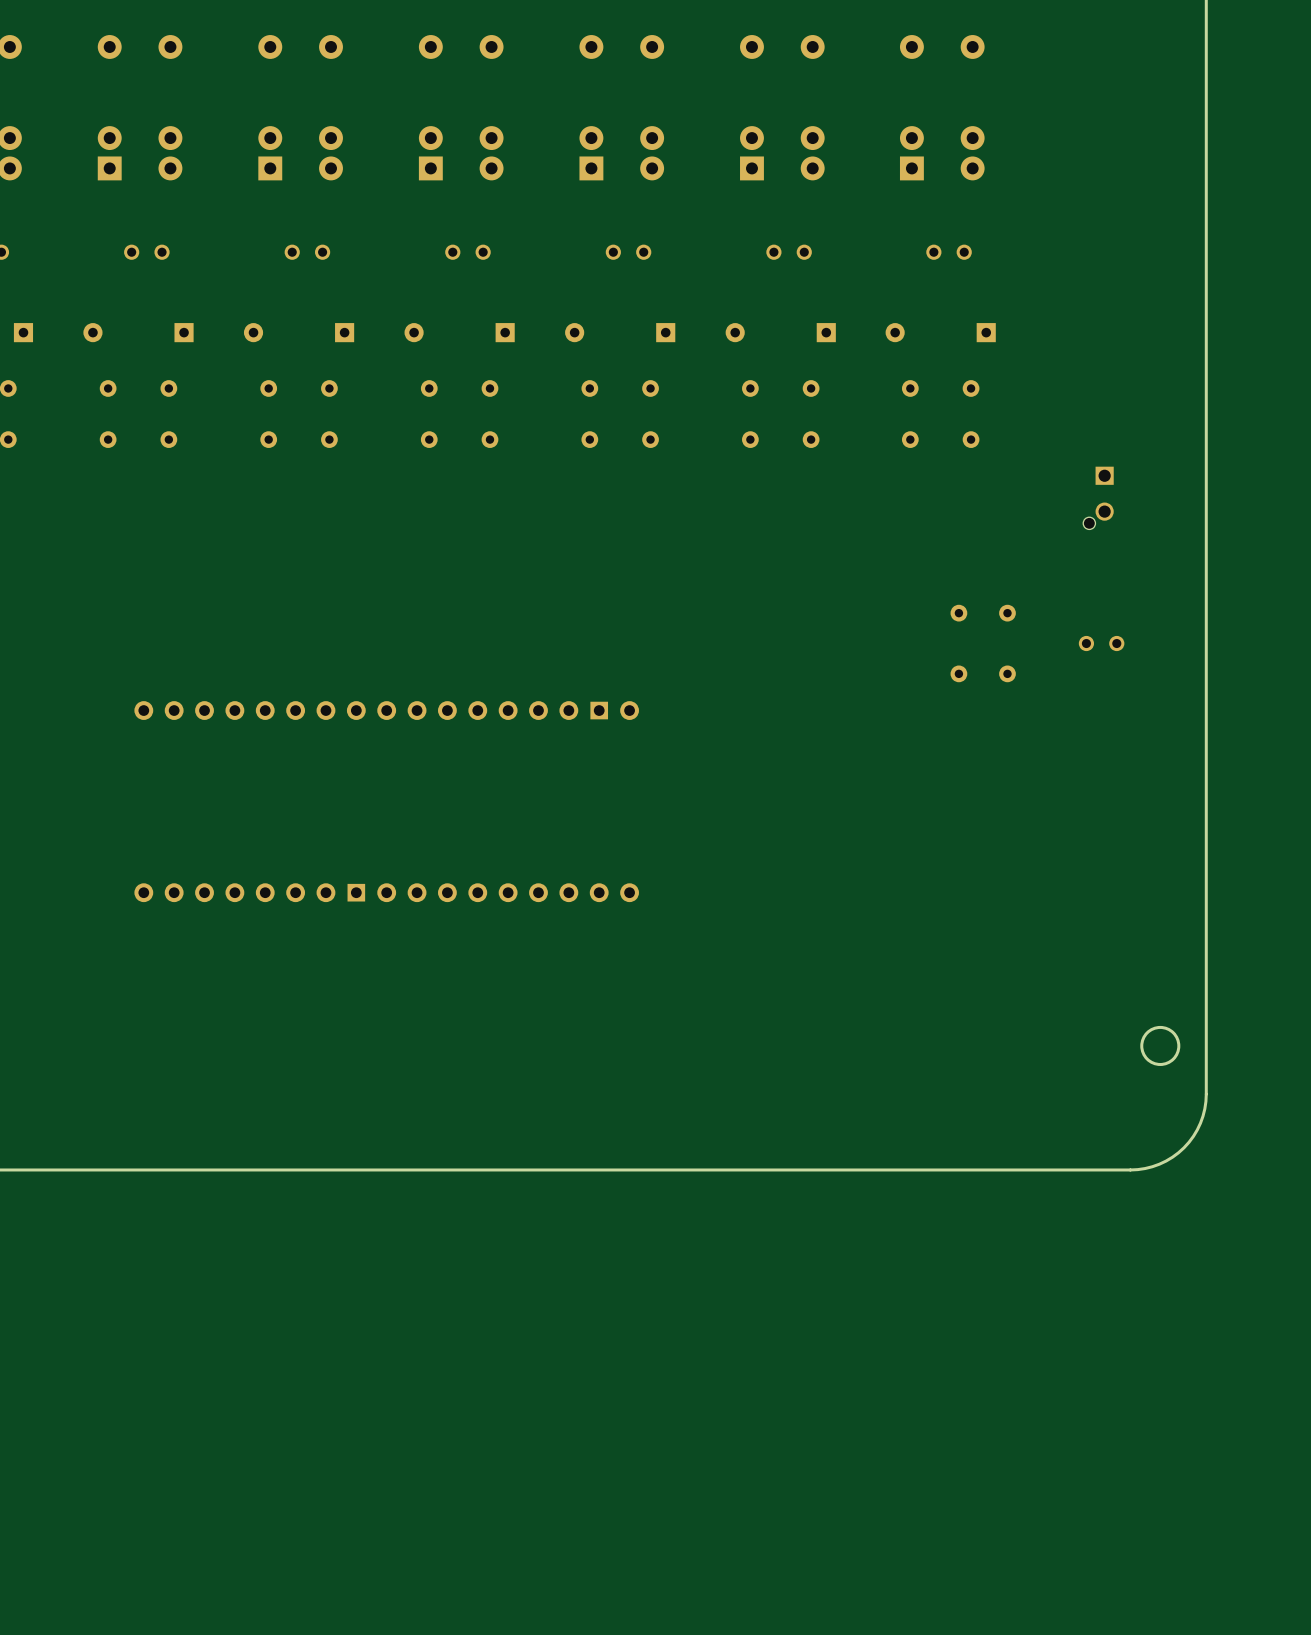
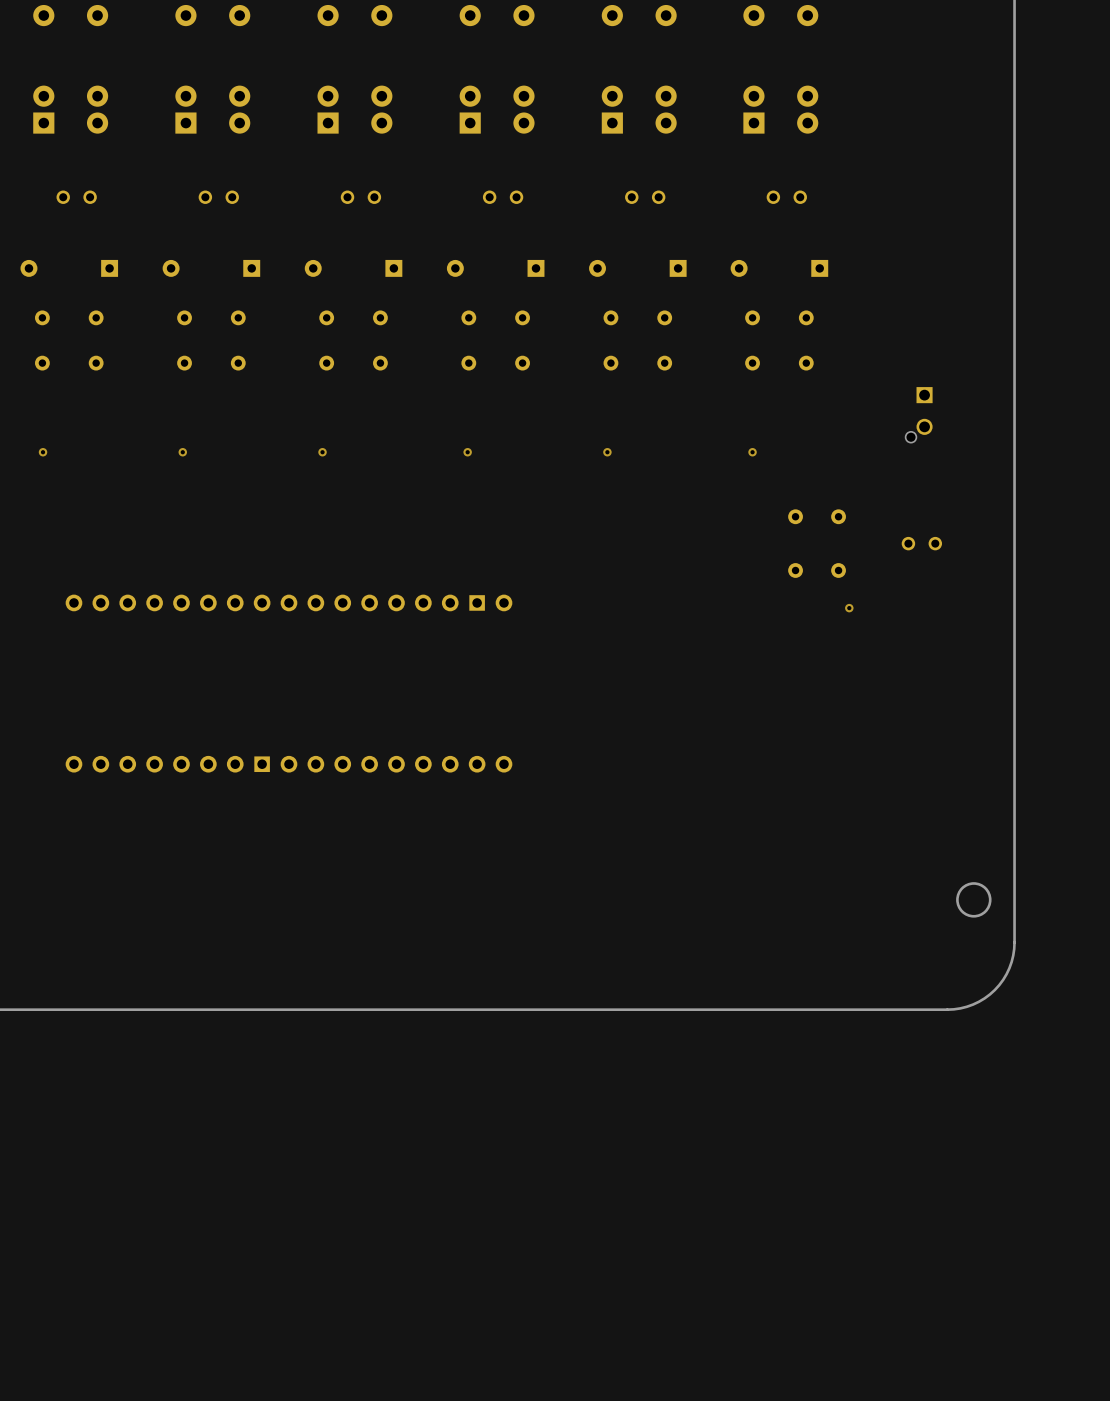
via: none -> (43, 452)
via: none -> (182, 452)
via: none -> (322, 452)
via: none -> (467, 452)
via: none -> (607, 452)
via: none -> (752, 452)
via: none -> (849, 608)

